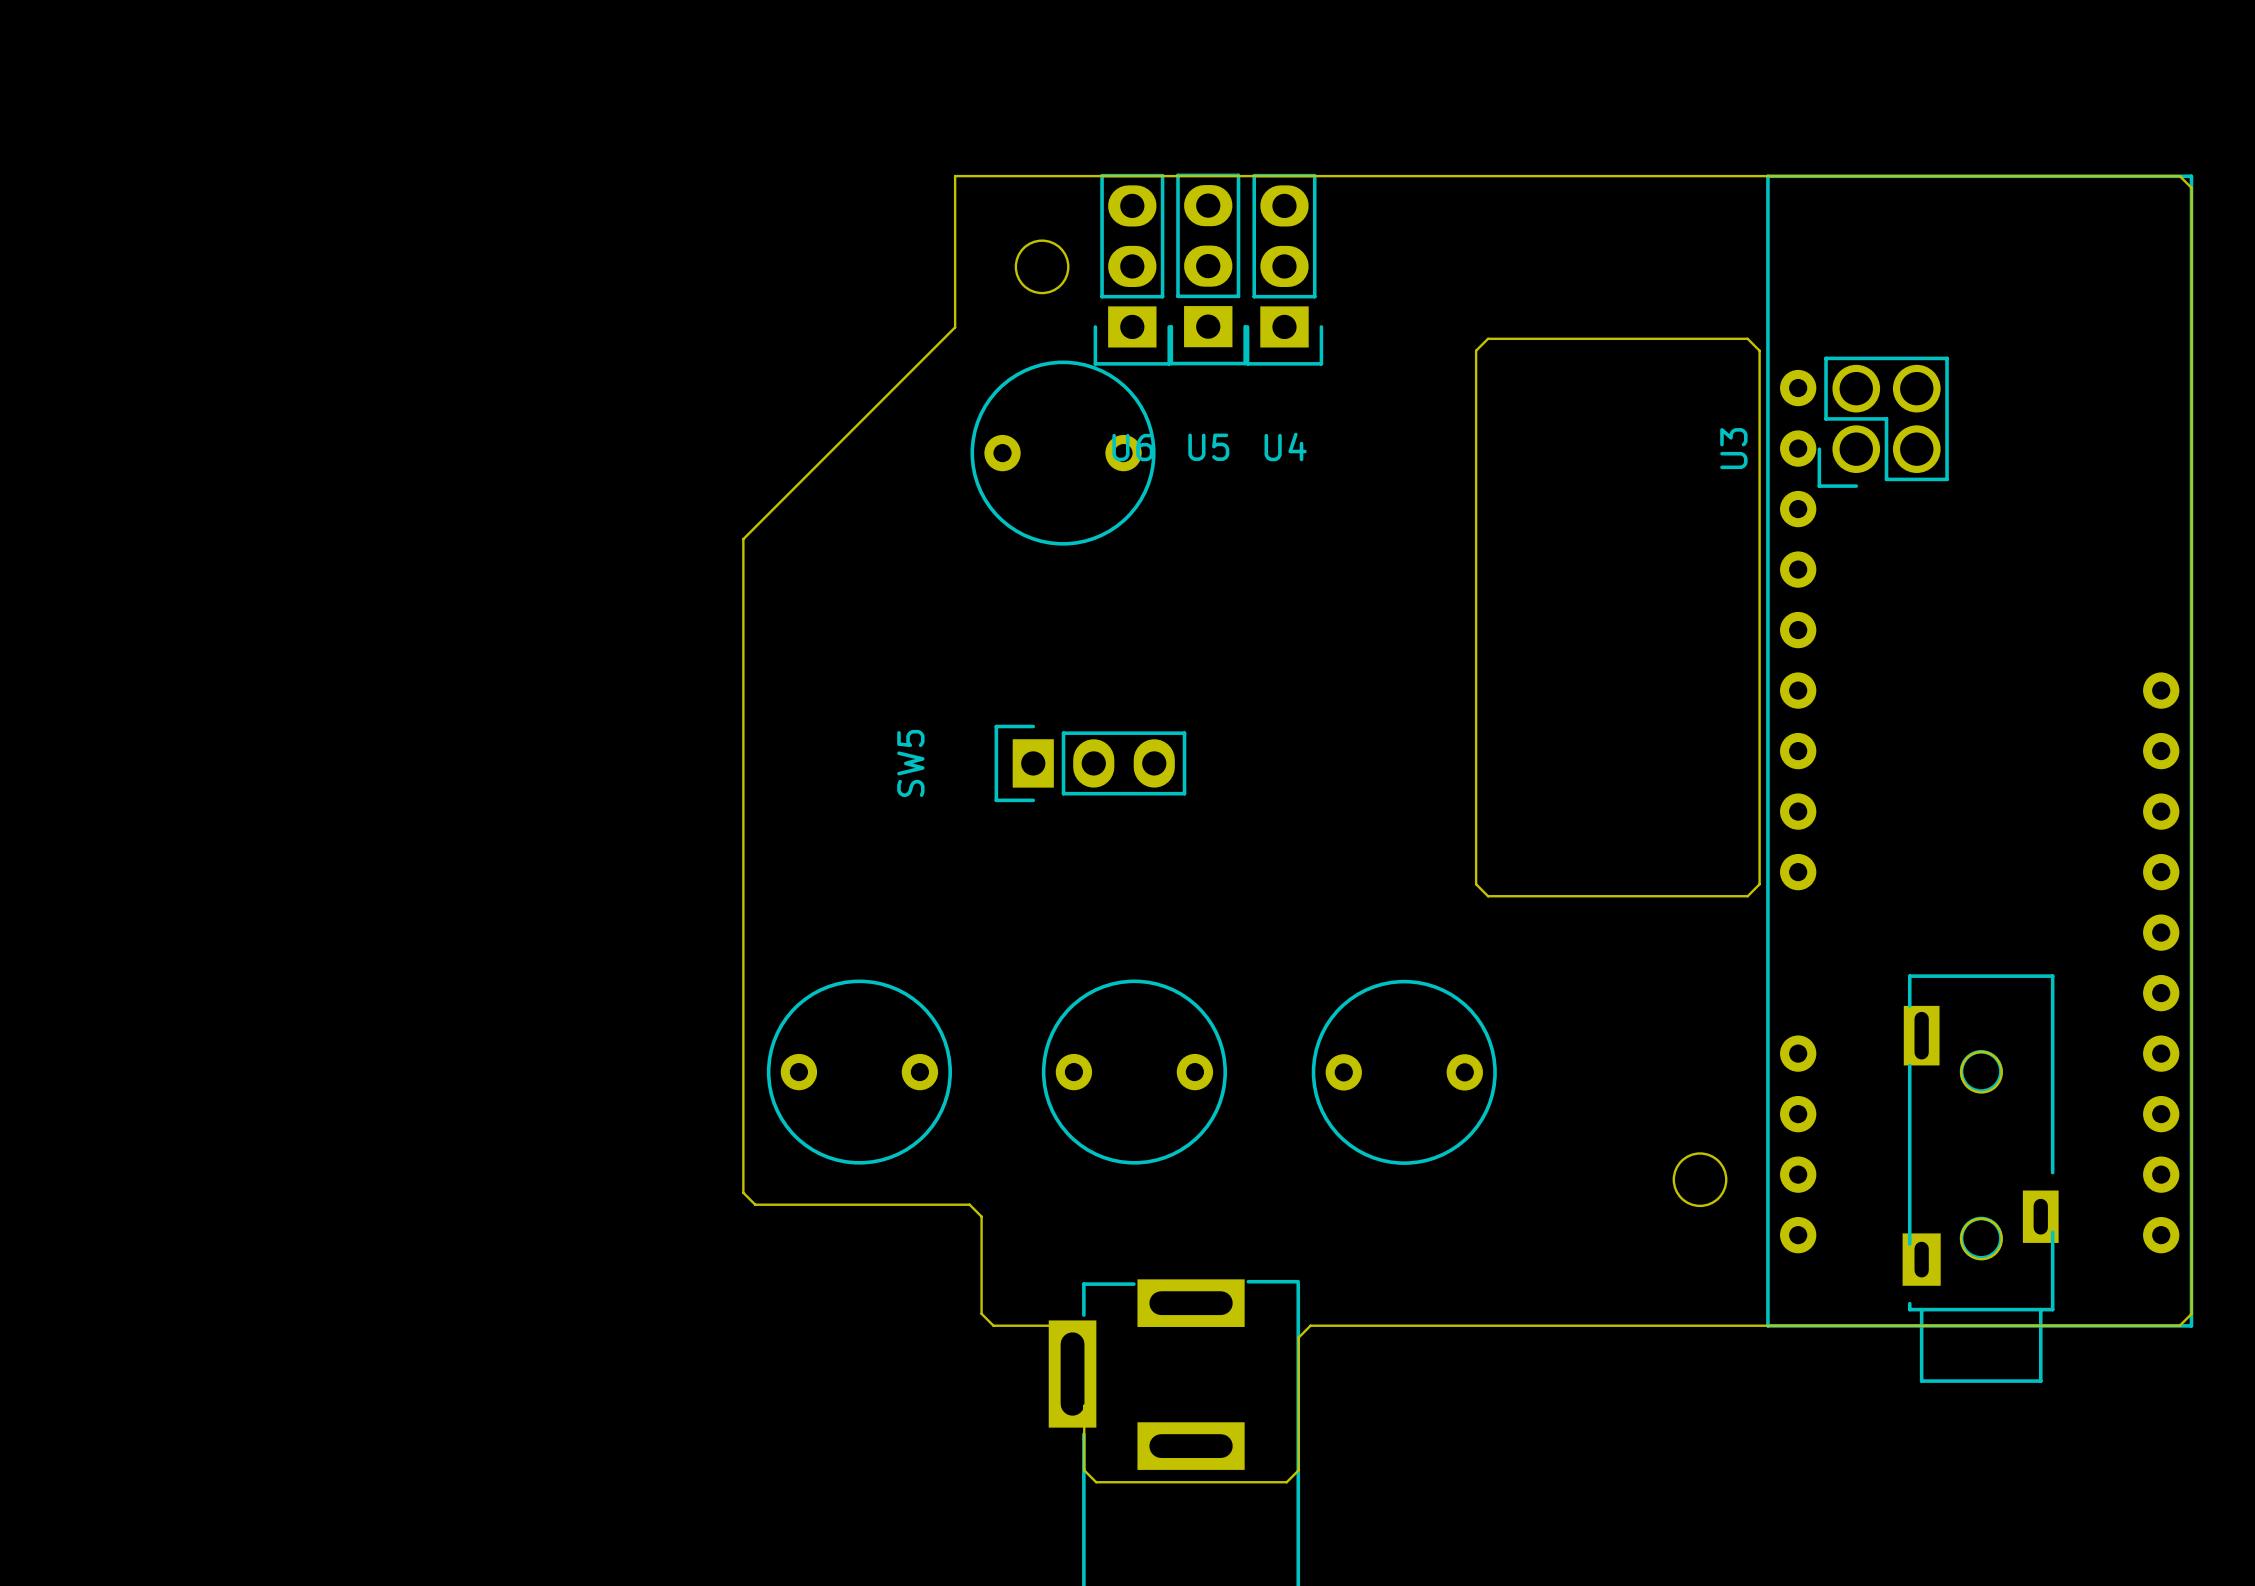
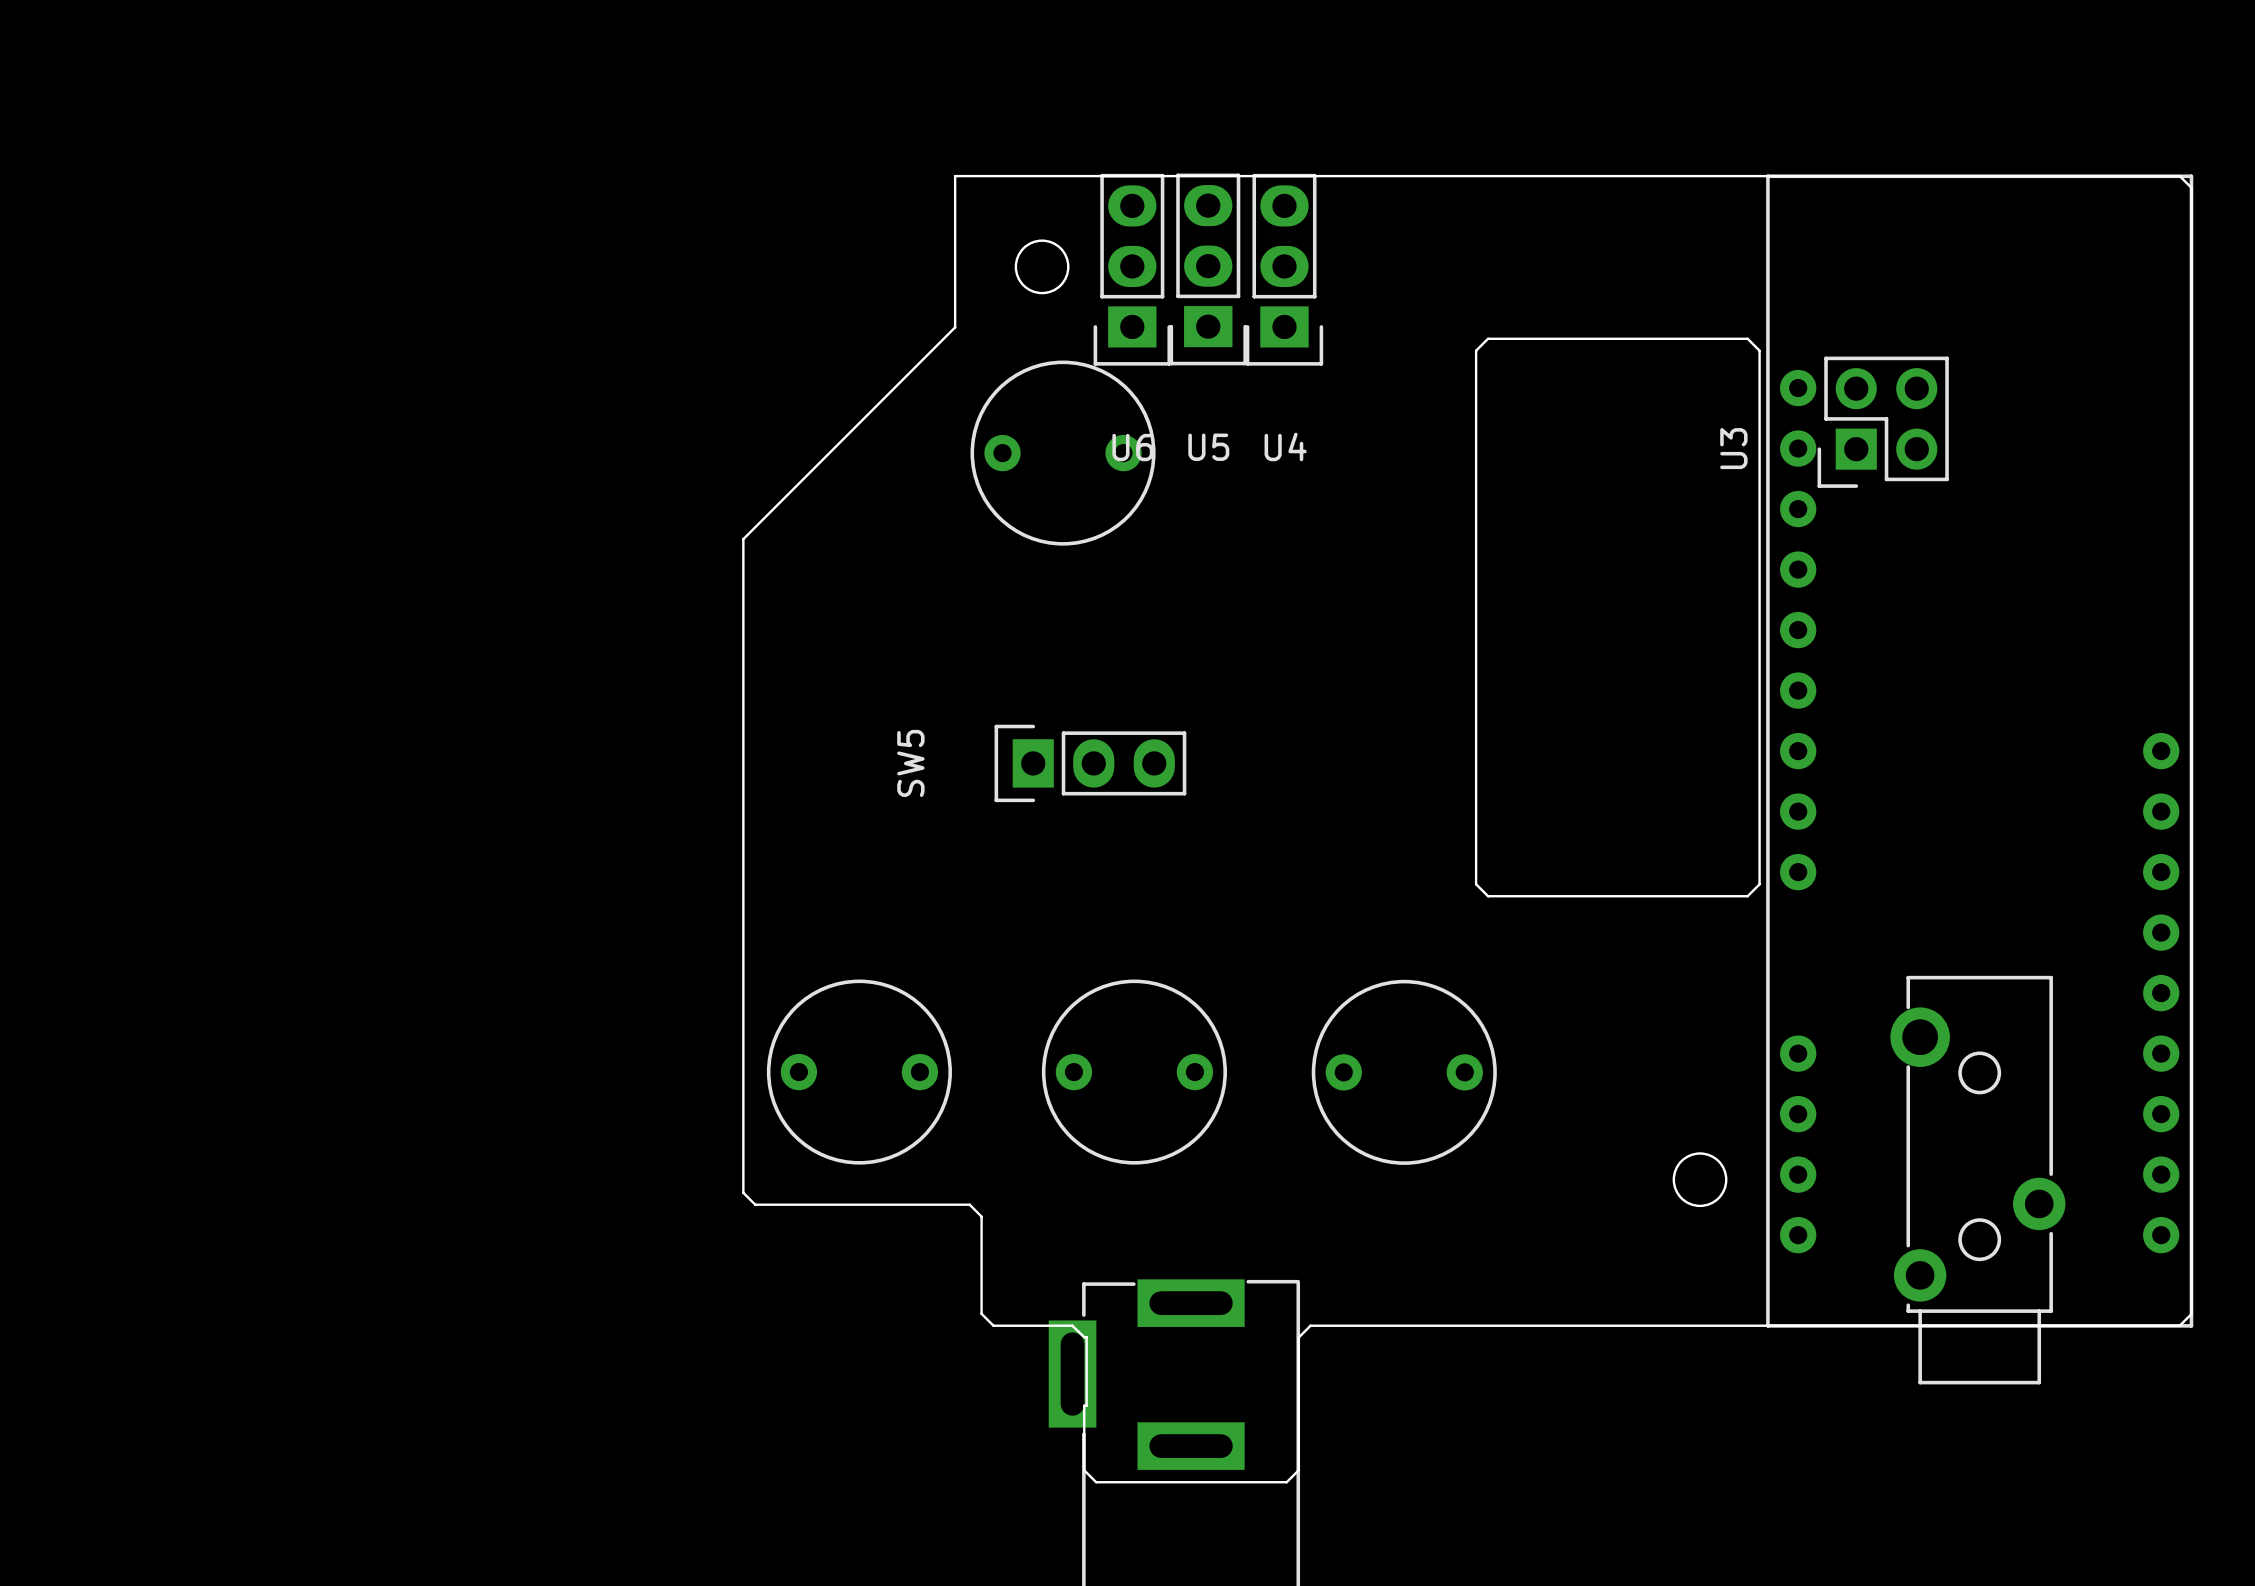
part footprint: [1766, 174, 2194, 1328] -> [1766, 174, 2194, 1328]
U3 footprint: [1817, 356, 1949, 488] -> [1817, 356, 1949, 488]
part footprint: [1902, 974, 2059, 1383] -> [1890, 975, 2066, 1385]
round board edge: [1960, 1050, 2003, 1094] -> none
round board edge: [1960, 1217, 2003, 1261] -> none

